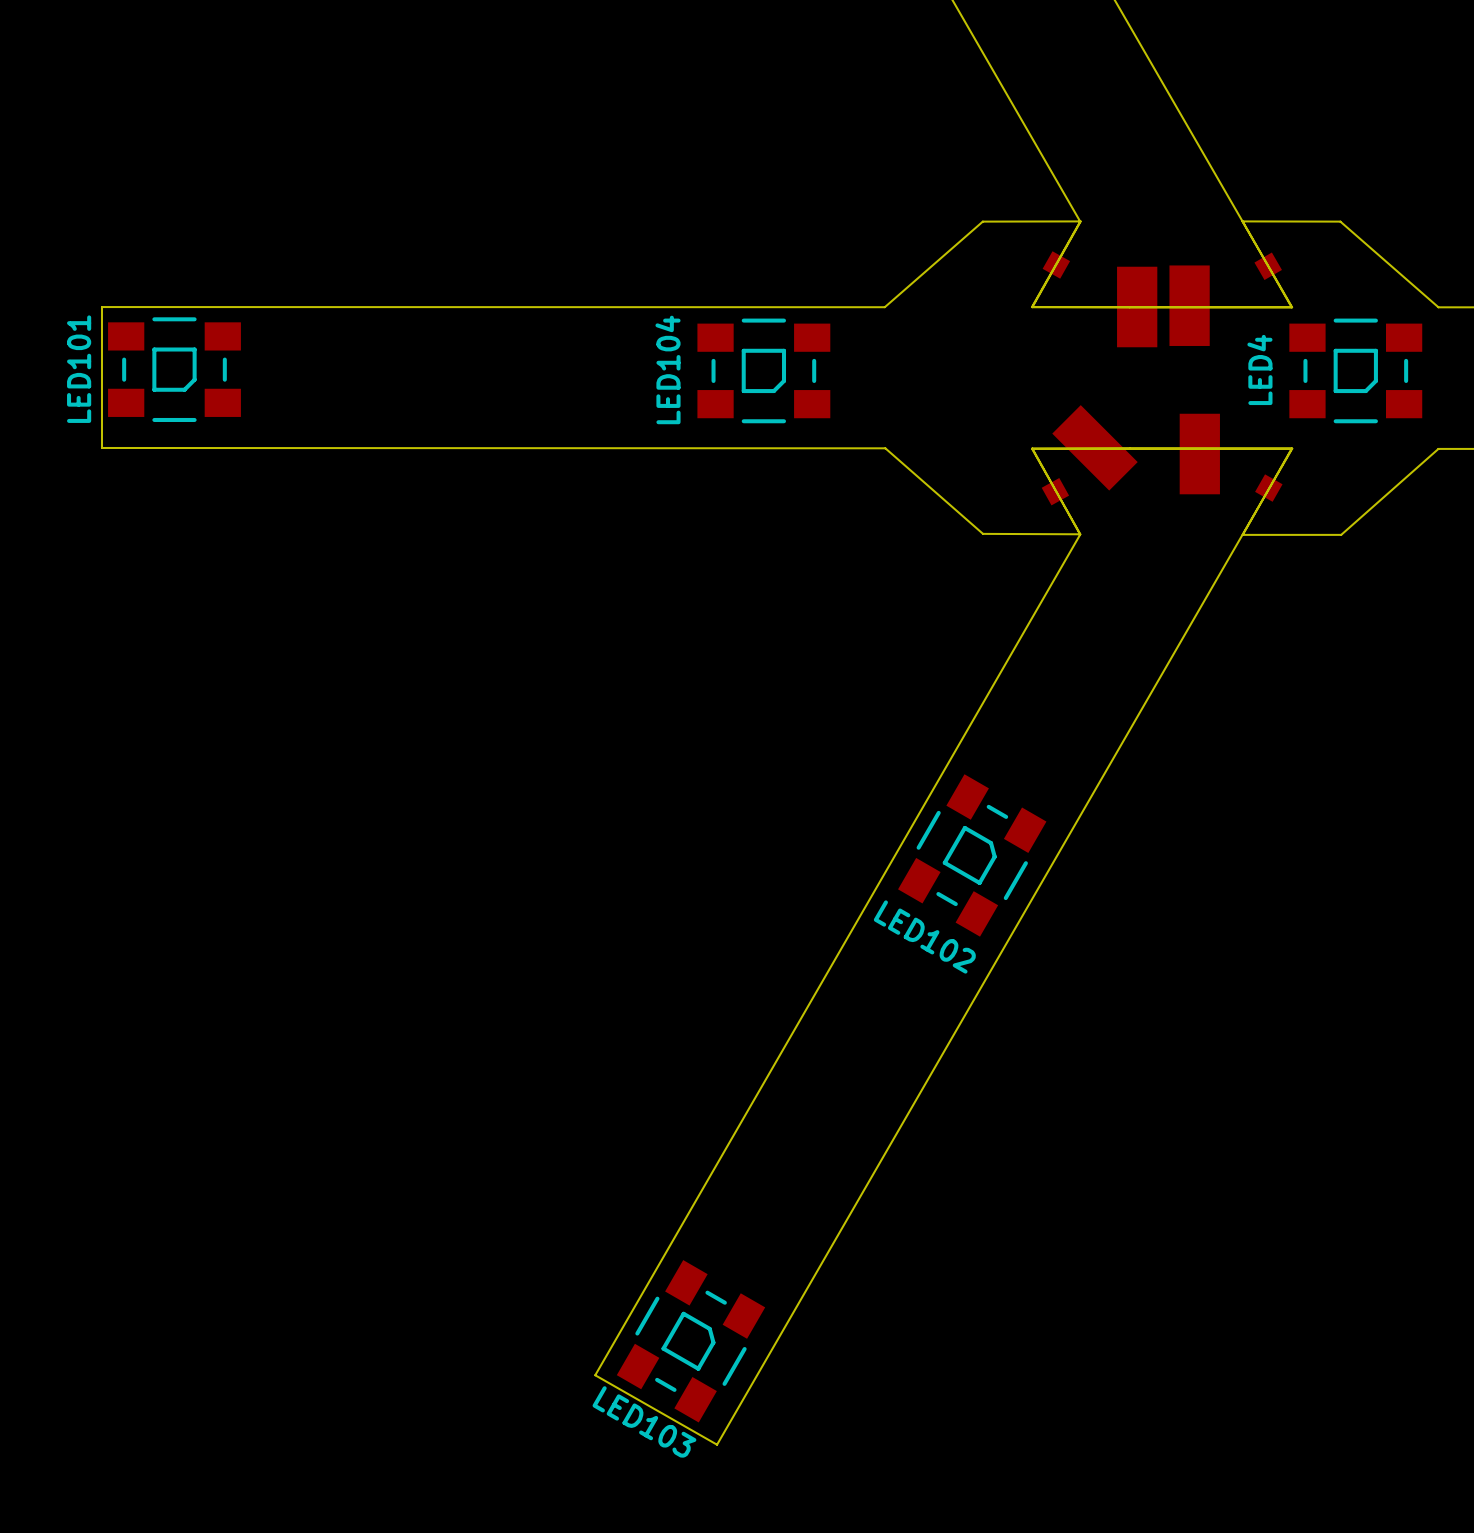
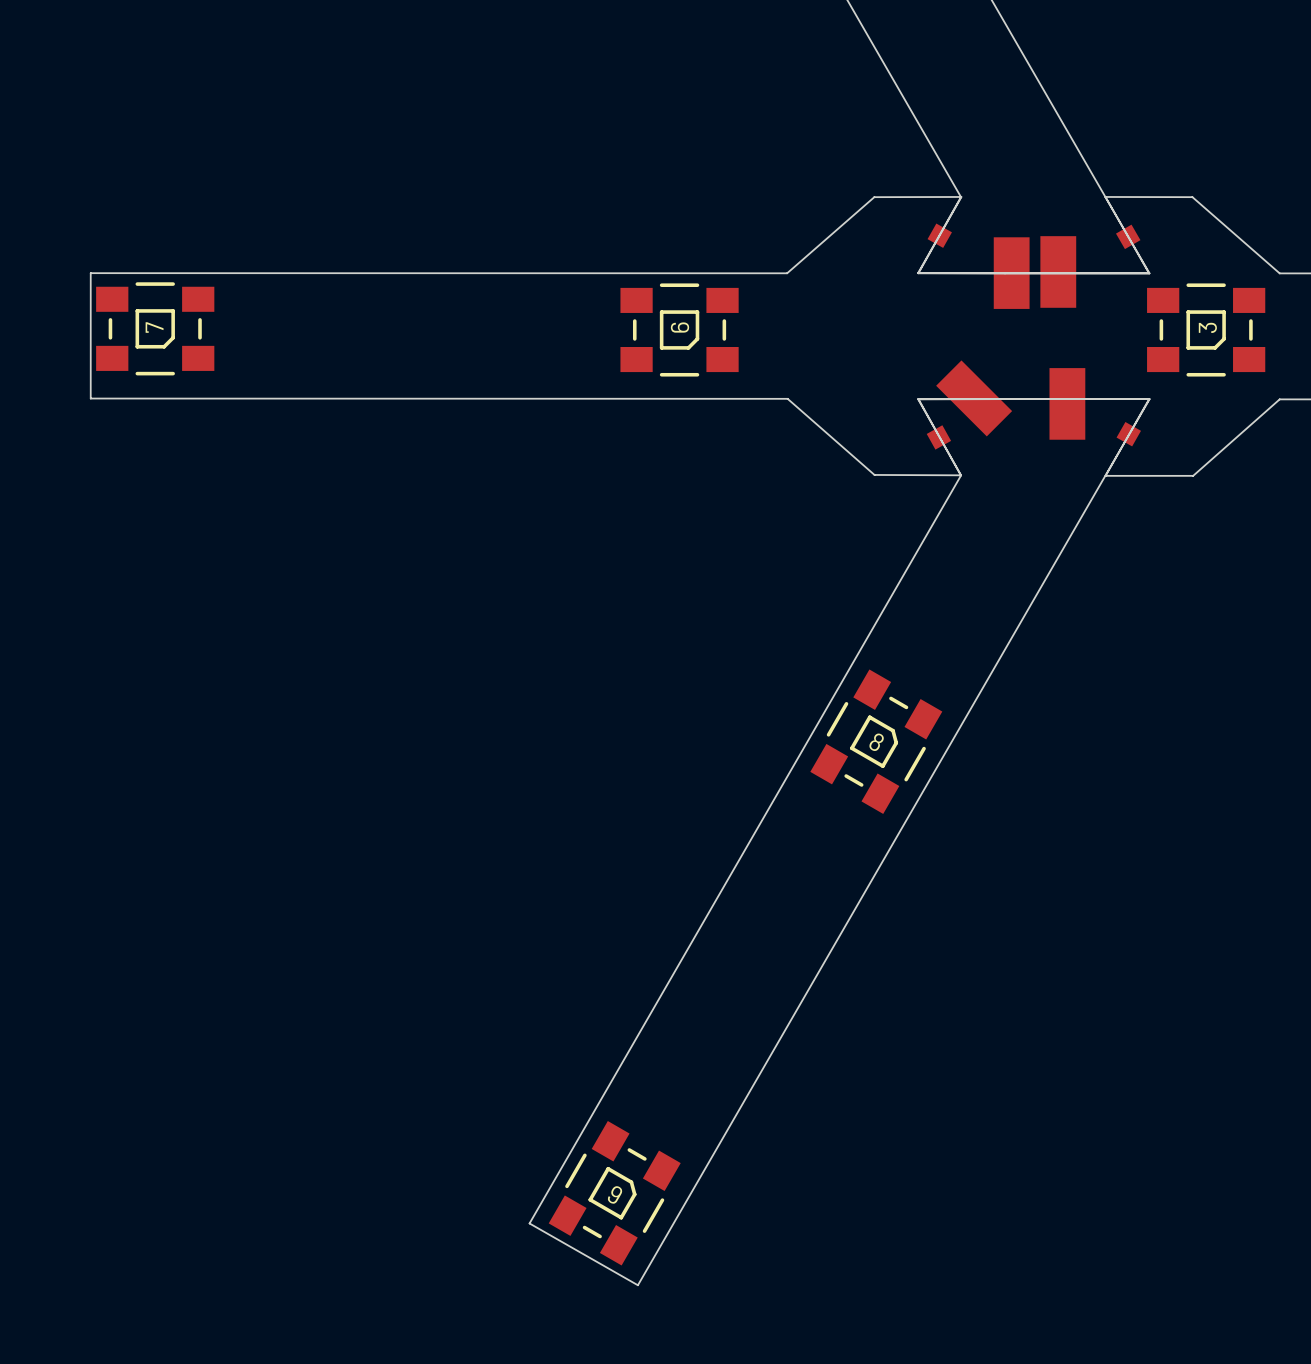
LED101 name: LED101 (79, 369) -> 7 (154, 327)
LED104 name: LED104 (668, 369) -> 6 (680, 327)
LED4 name: LED4 (1259, 369) -> 3 (1207, 327)
8: none -> (876, 741)
LED102: (972, 855) -> none
LED103 name: LED103 (644, 1421) -> 9 (614, 1195)

